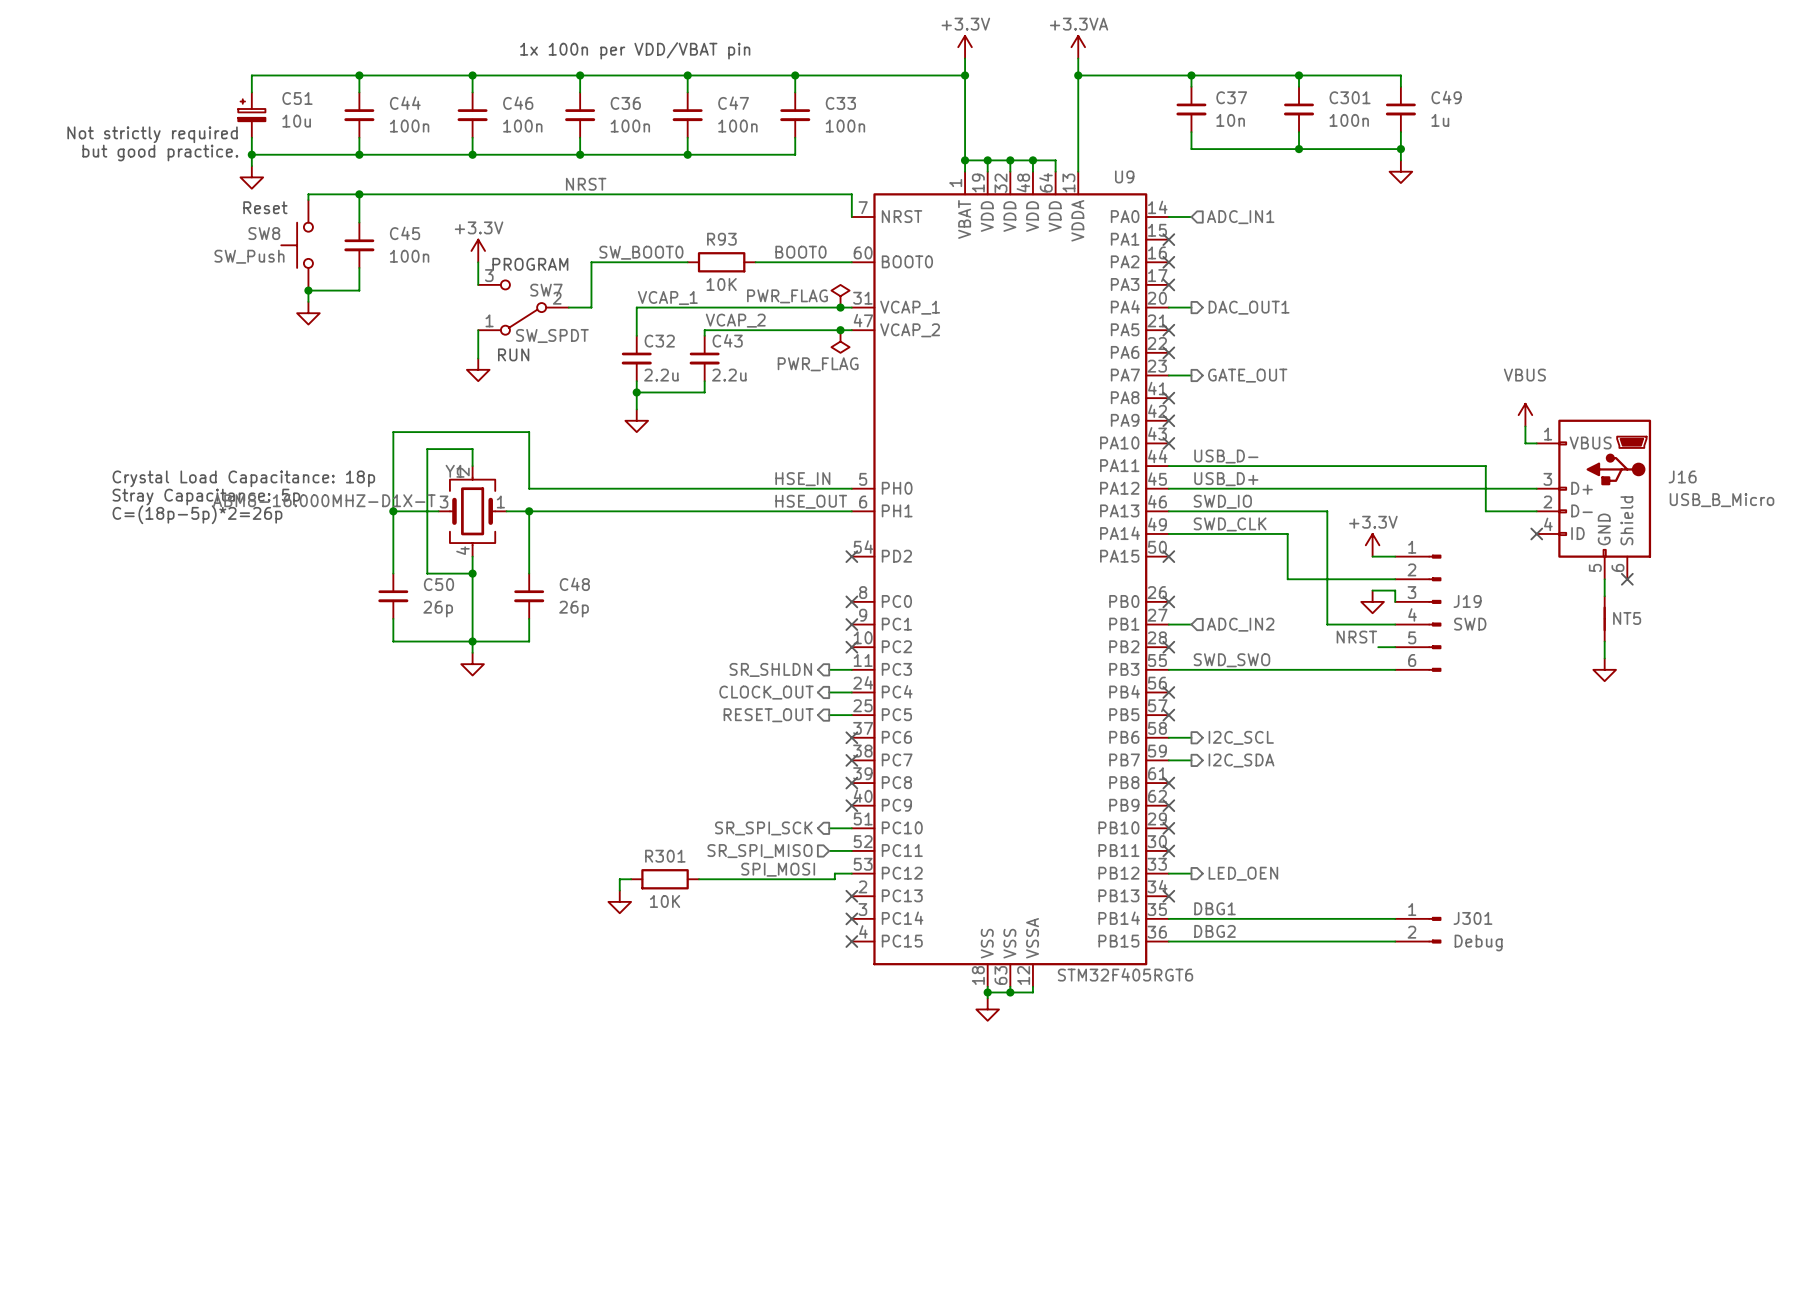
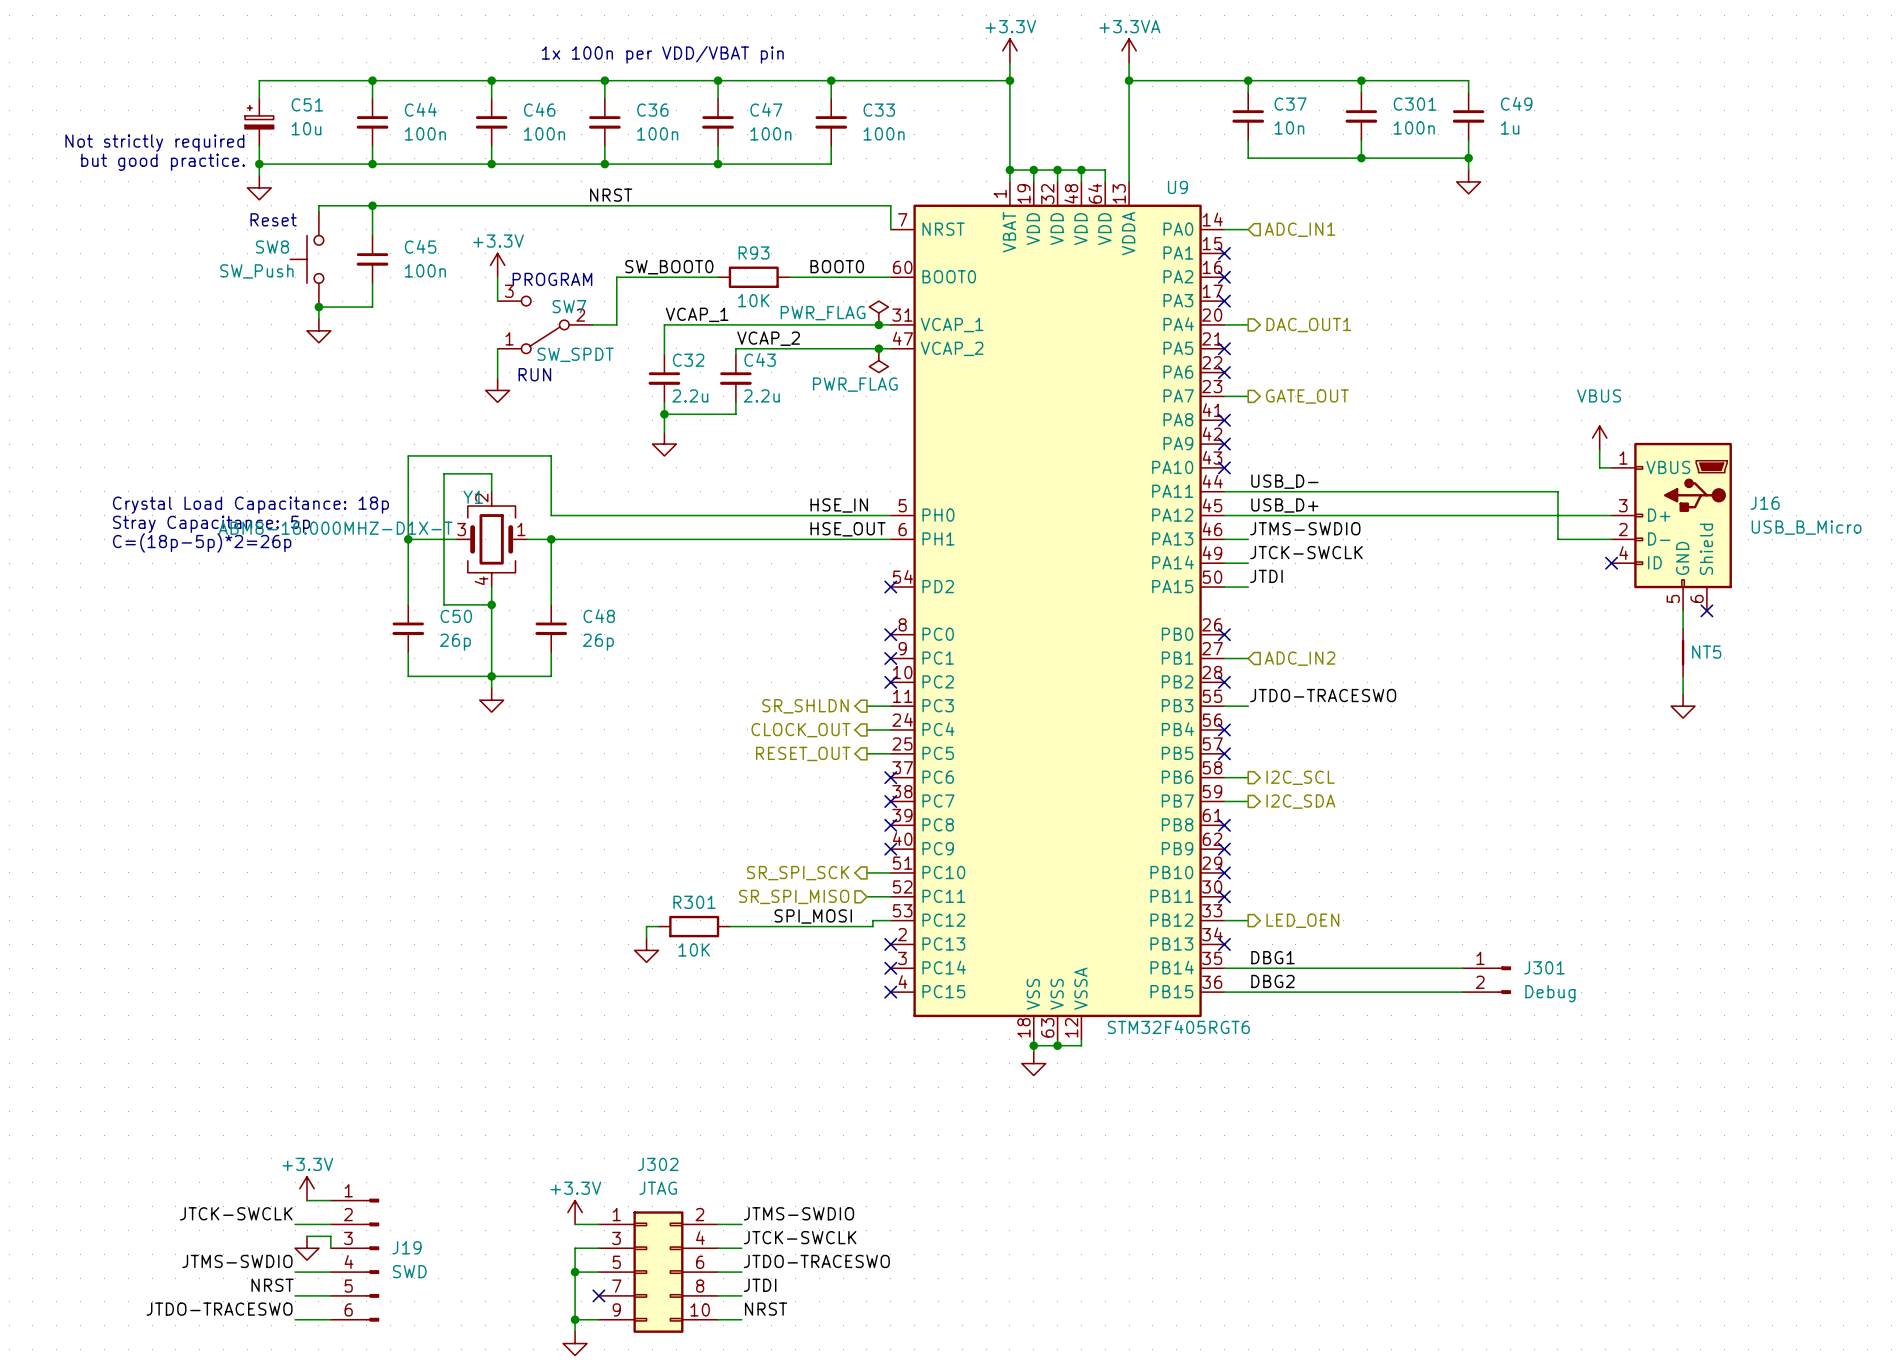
label: SWD_IO (1222, 501) -> JTMS-SWDIO (1305, 528)
wire: (1191, 511) (1327, 511) (1327, 624) (1395, 624) -> none
label: SWD_CLK (1230, 524) -> JTCK-SWCLK (1306, 552)
wire: (1191, 533) (1287, 533) (1287, 579) (1395, 579) -> none
power symbol: +3.3V (1372, 545) -> none
label: none -> JTDI (1266, 576)
no-connect mark: (1168, 556) -> none
wire: (1372, 556) (1395, 556) -> (1224, 587) (1248, 587)
wire: (1372, 590) (1395, 590) (1395, 601) -> none
power symbol: (1372, 601) -> none
J19 position: (1418, 613) -> (355, 1260)
label: NRST (1356, 637) -> none
wire: (1378, 647) (1395, 647) -> none
label: SWD_SWO (1231, 660) -> JTDO-TRACESWO (1323, 695)
wire: (1191, 669) (1395, 669) -> none
power symbol: none -> +3.3V (307, 1188)
wire: none -> (307, 1200) (330, 1200)
power symbol: none -> +3.3V (575, 1212)
label: none -> JTCK-SWCLK (236, 1213)
label: none -> JTMS-SWDIO (798, 1213)
wire: none -> (295, 1224) (330, 1224)
wire: none -> (575, 1224) (598, 1224)
wire: none -> (718, 1224) (741, 1224)
wire: none -> (307, 1236) (330, 1236) (330, 1248)
label: none -> JTCK-SWCLK (800, 1237)
power symbol: none -> (307, 1248)
wire: none -> (598, 1248) (575, 1248) (575, 1331)
wire: none -> (718, 1248) (741, 1248)
label: none -> JTMS-SWDIO (237, 1261)
label: none -> JTDO-TRACESWO (816, 1261)
wire: none -> (295, 1272) (330, 1272)
wire: none -> (575, 1272) (598, 1272)
junction: none -> (575, 1272)
J302: none -> JTAG (658, 1272)
wire: none -> (718, 1272) (741, 1272)
label: none -> NRST (272, 1285)
label: none -> JTDI (760, 1285)
wire: none -> (295, 1295) (330, 1295)
no-connect mark: none -> (598, 1295)
wire: none -> (718, 1295) (741, 1295)
label: none -> JTDO-TRACESWO (219, 1309)
label: none -> NRST (766, 1309)
wire: none -> (295, 1319) (330, 1319)
wire: none -> (575, 1319) (598, 1319)
junction: none -> (575, 1319)
wire: none -> (718, 1319) (741, 1319)
power symbol: none -> (575, 1343)

